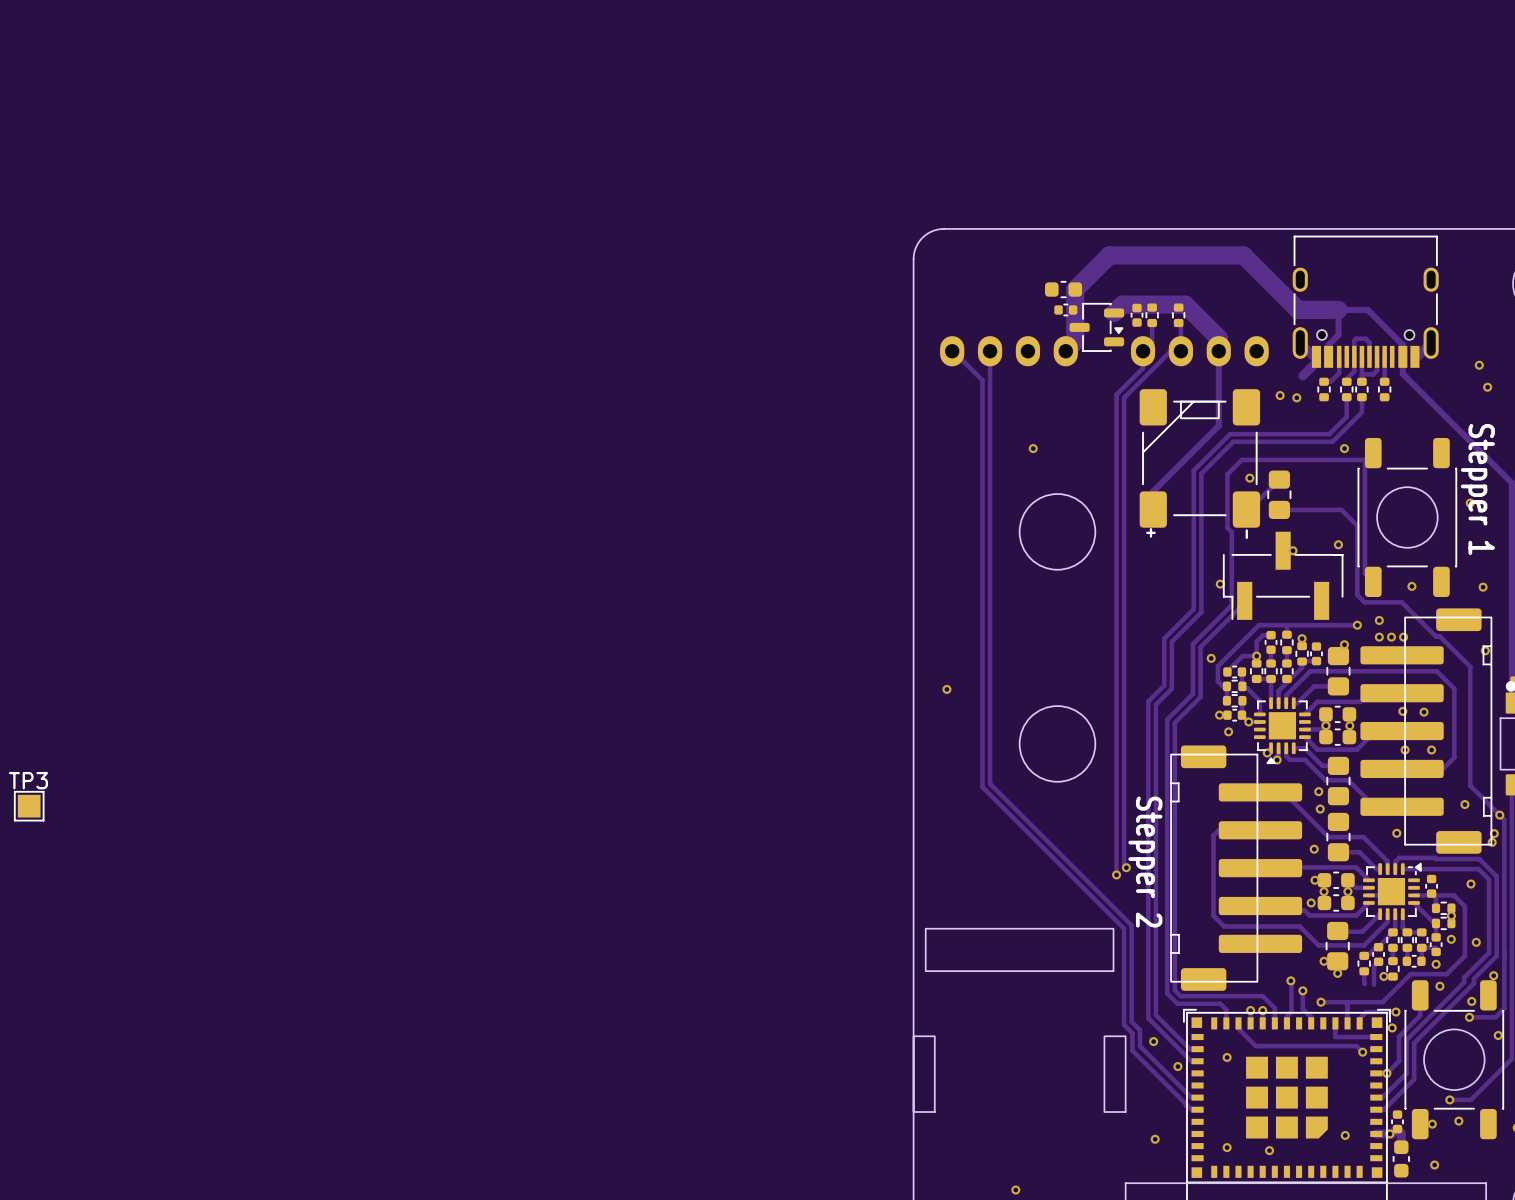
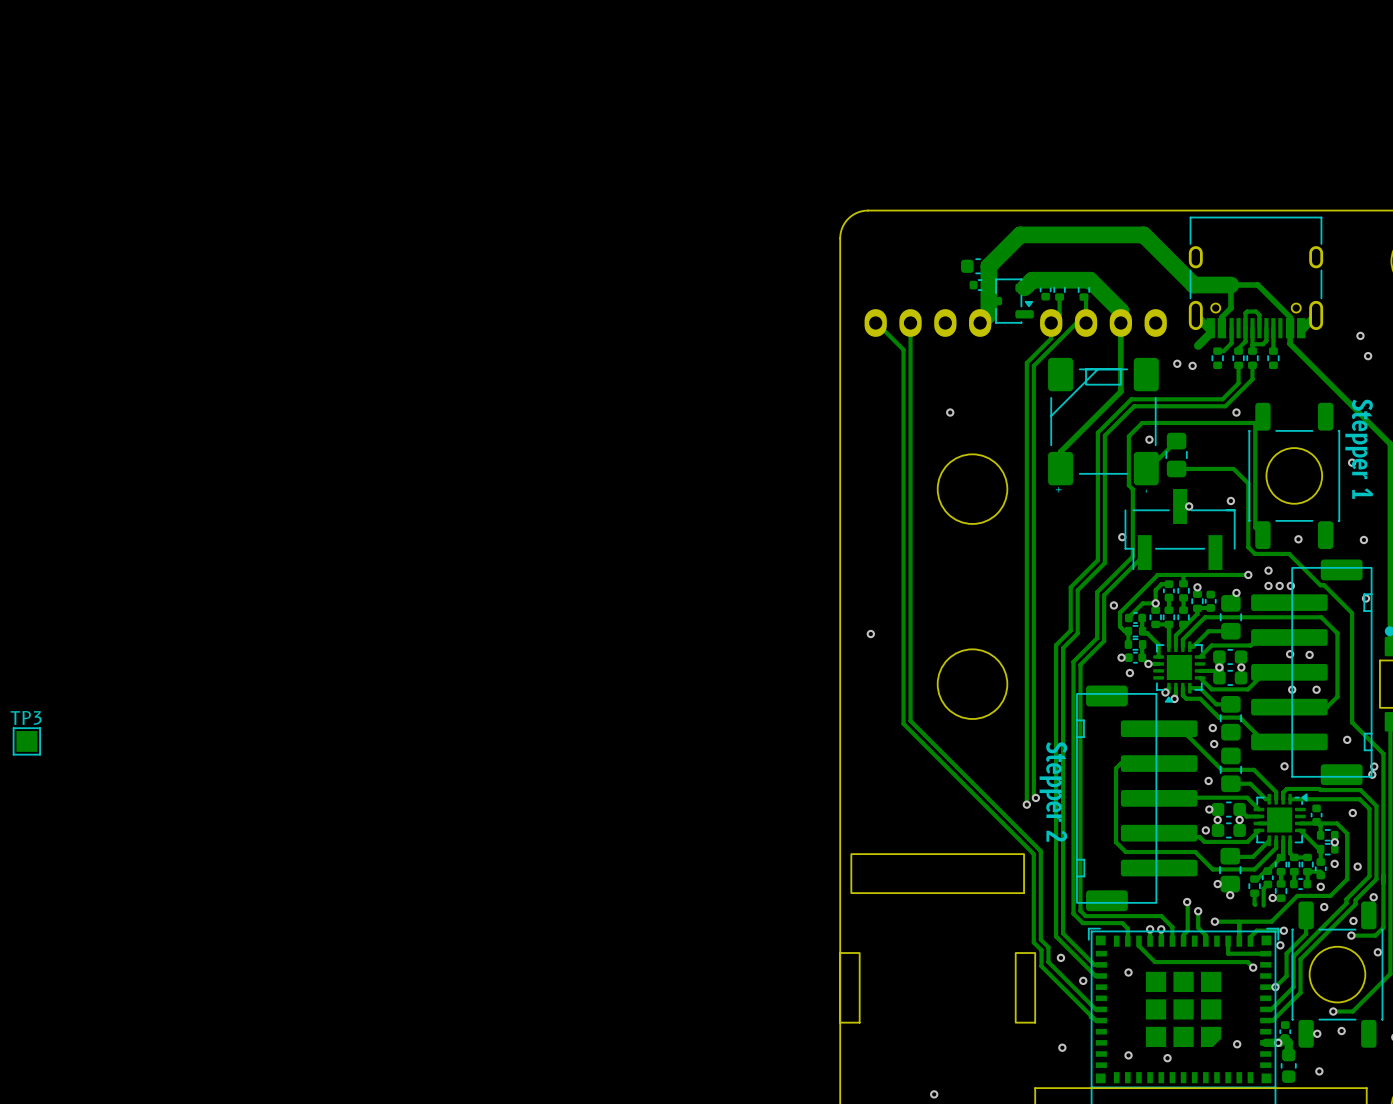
via: (1499, 815) -> none

